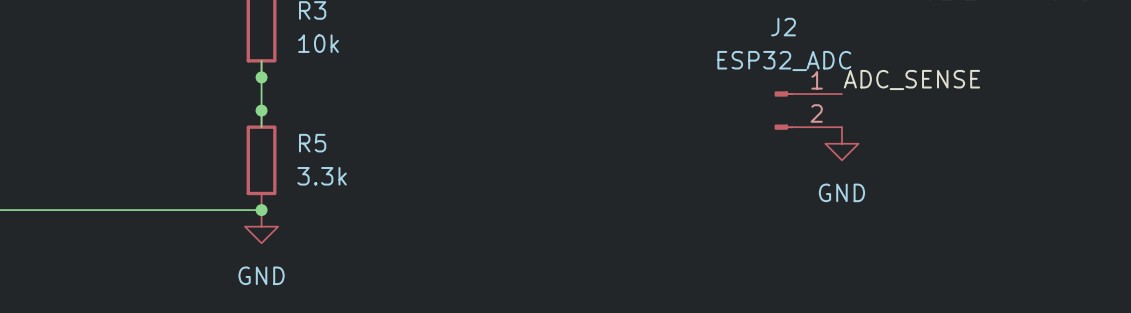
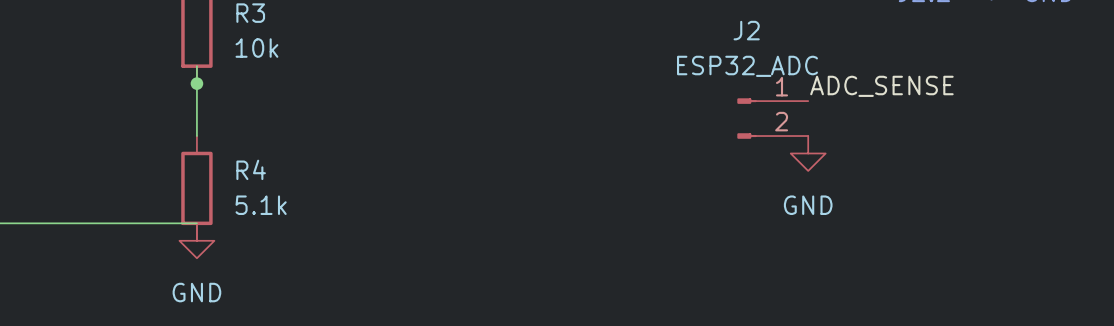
junction: (261, 110) -> none
R5: 3.3k (261, 160) -> none
R4: none -> 5.1k (196, 188)
junction: (261, 210) -> none

